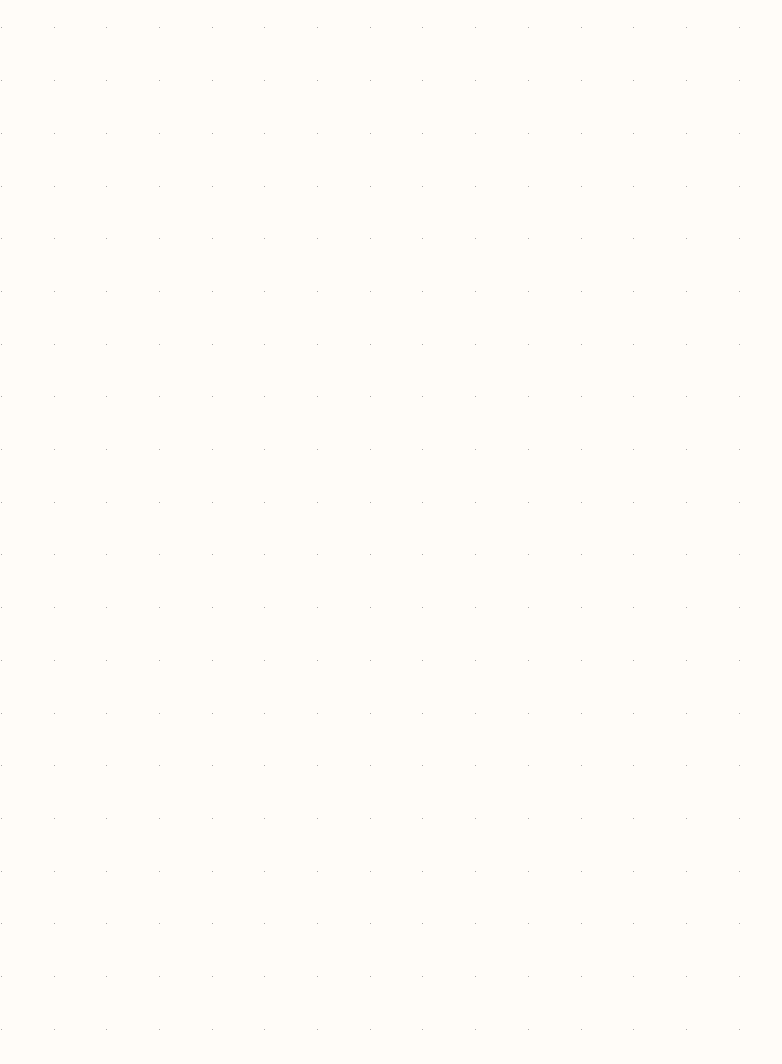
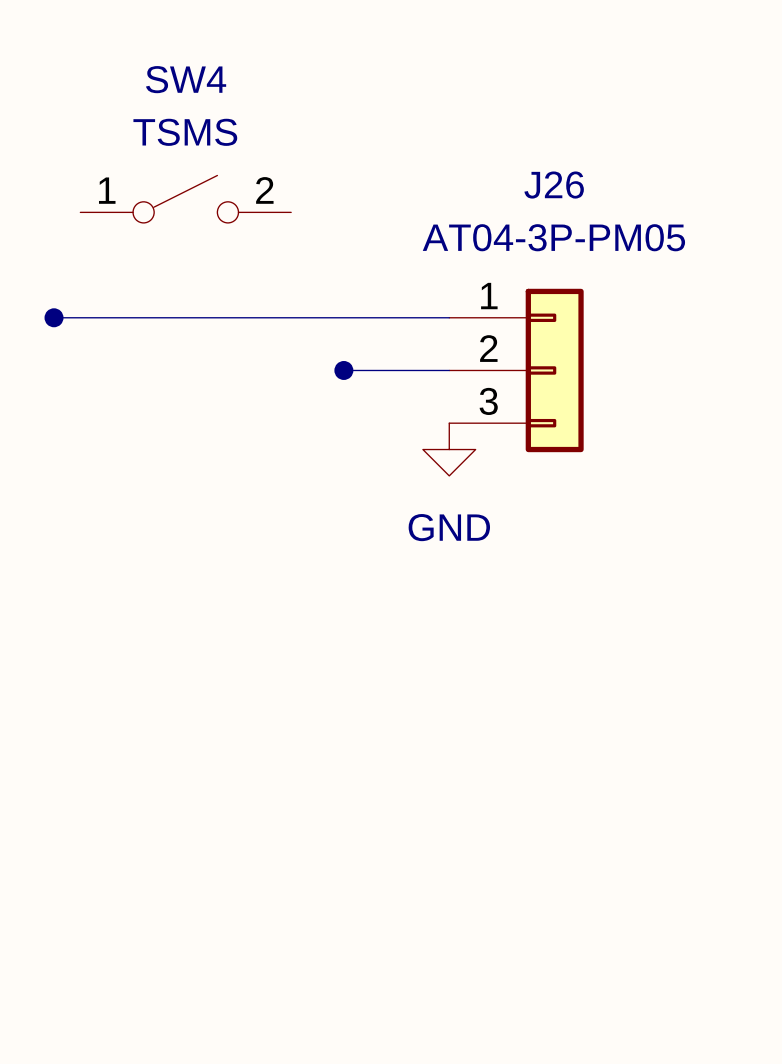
SW4: none -> TSMS (185, 199)
wire: none -> (54, 317) (449, 317)
junction: none -> (54, 317)
wire: none -> (343, 370) (449, 370)
junction: none -> (343, 370)
J26: none -> AT04-3P-PM05 (516, 370)
power symbol: none -> GND (449, 449)

